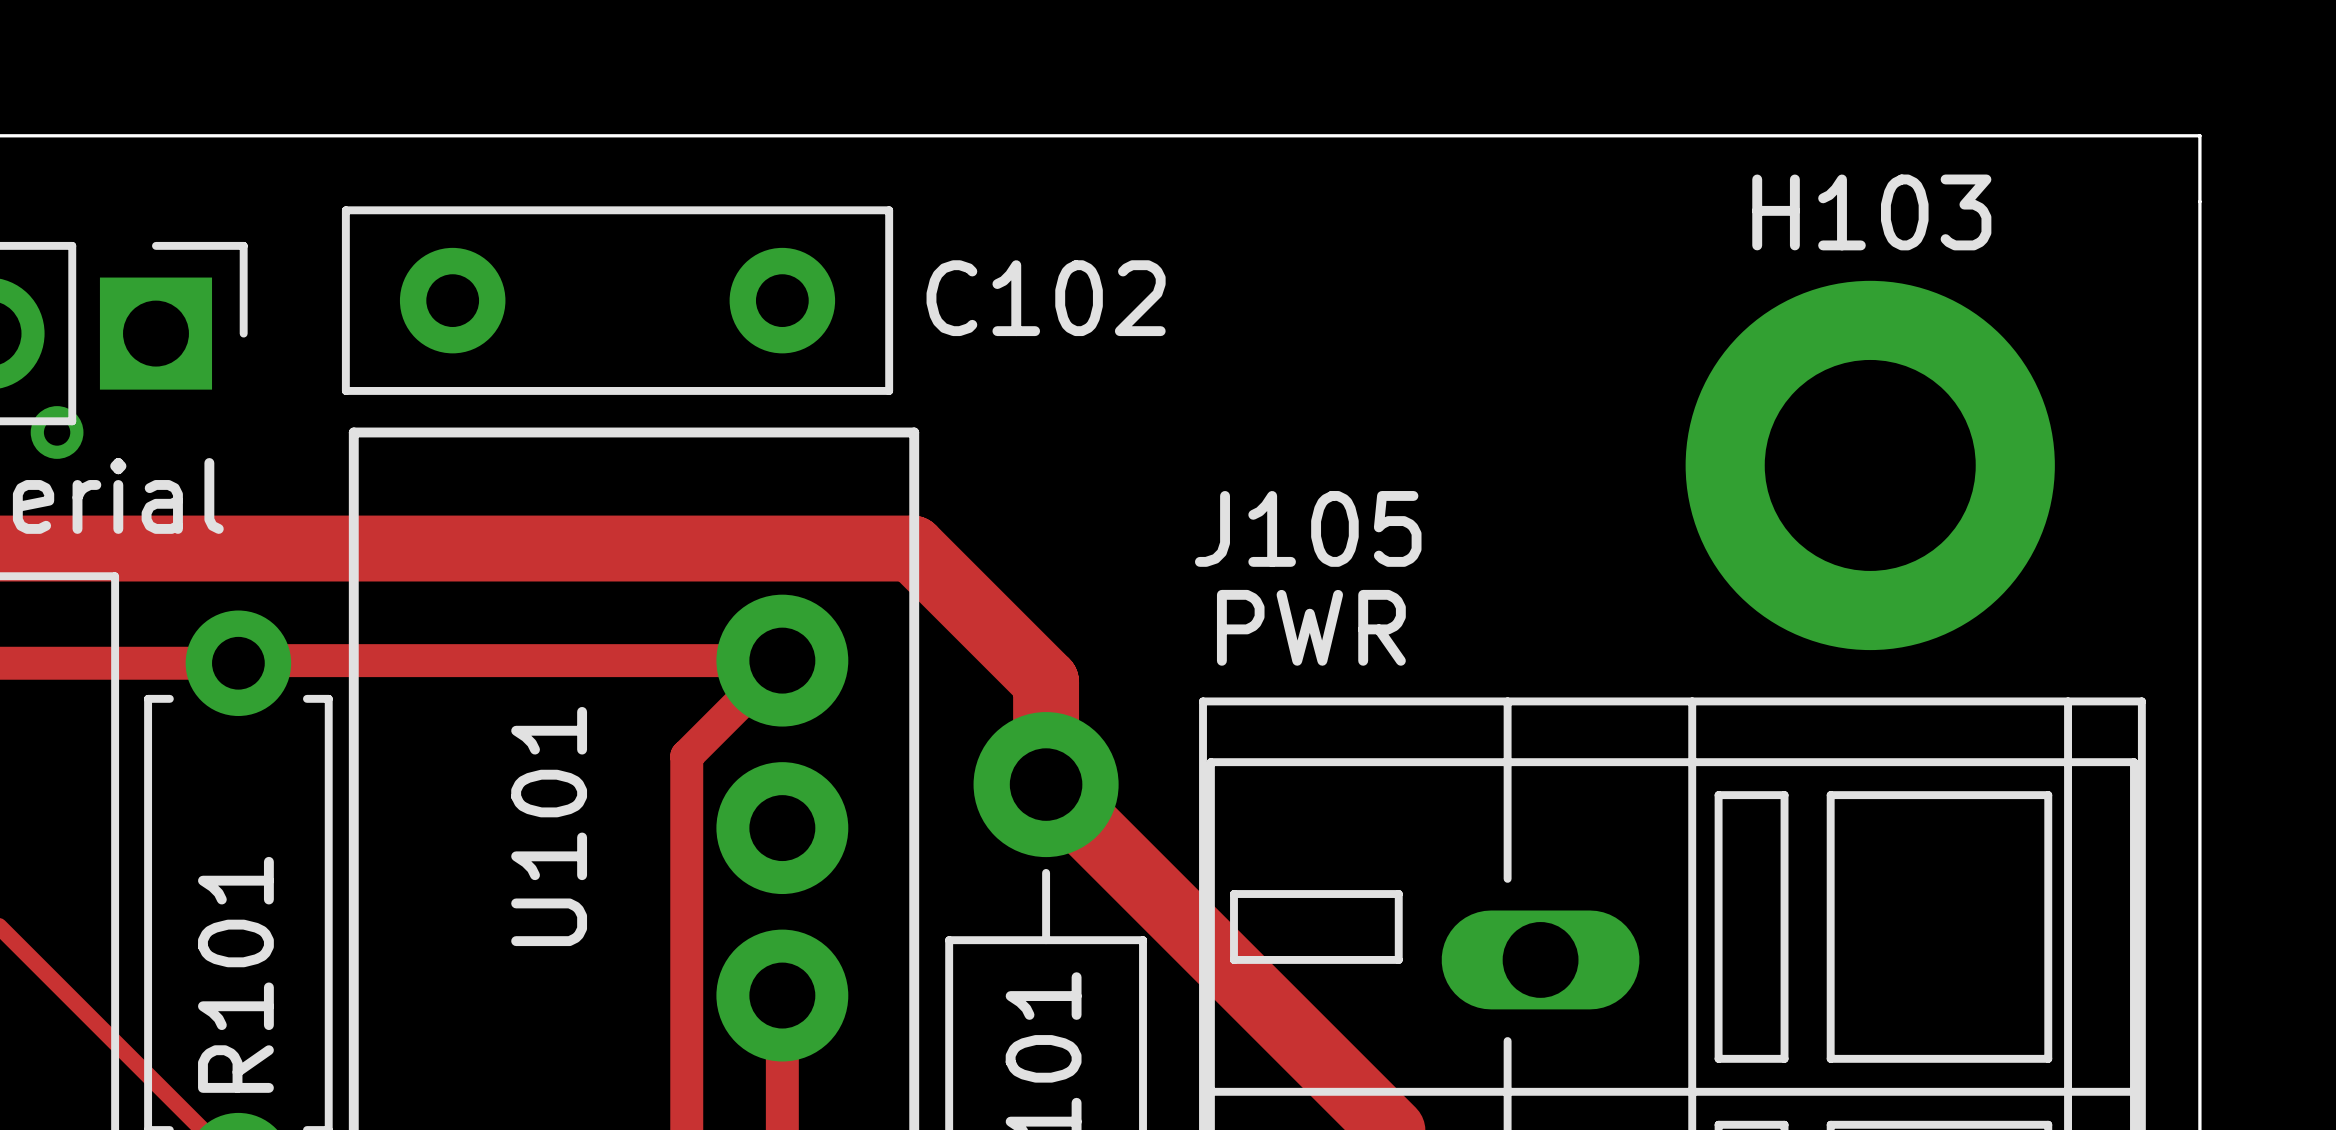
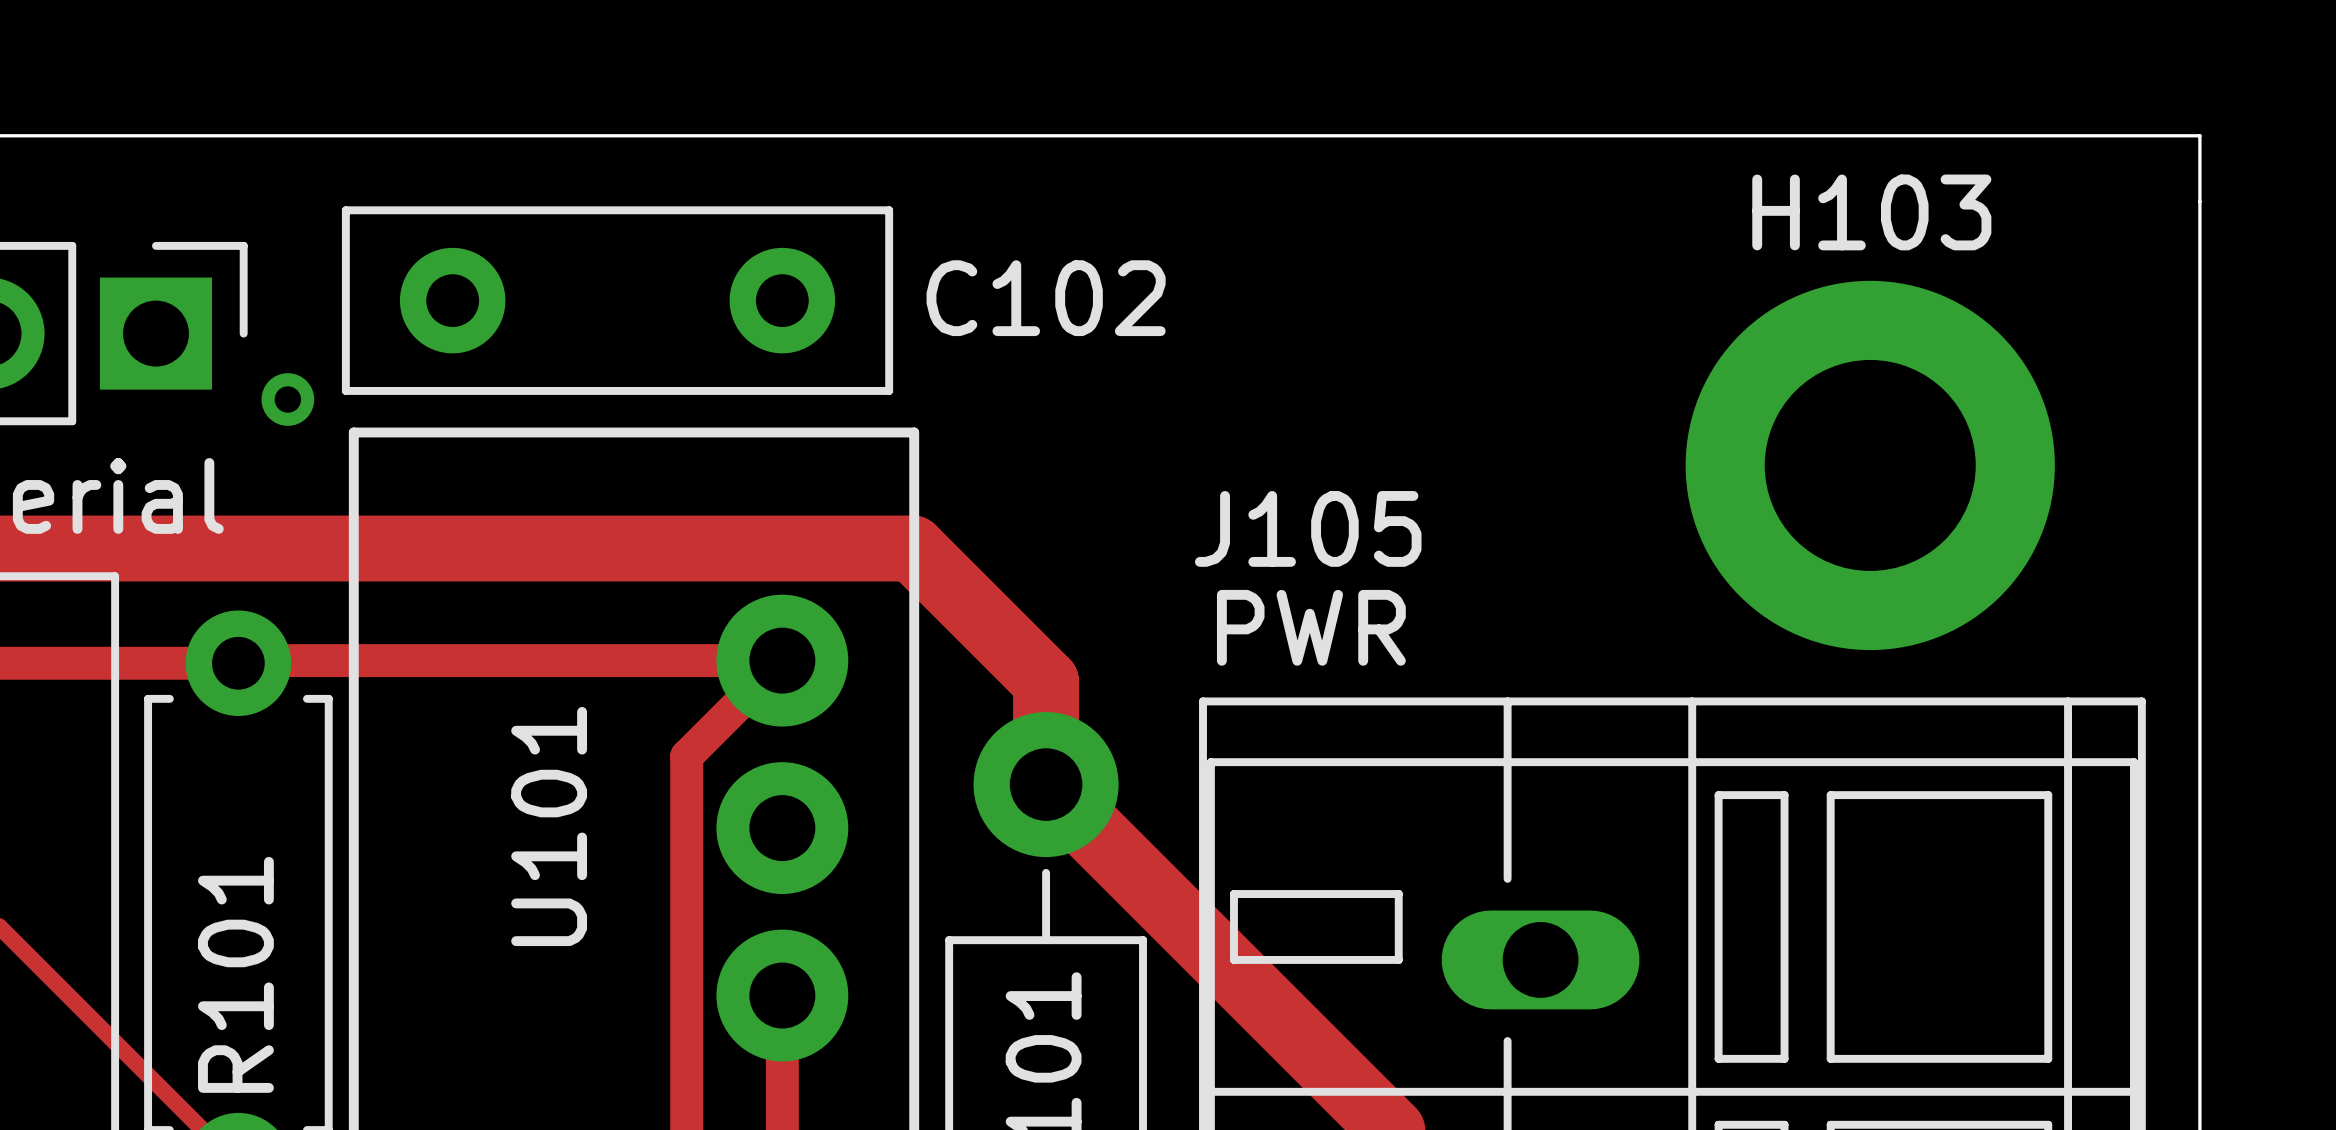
via position: (57, 432) -> (287, 399)

